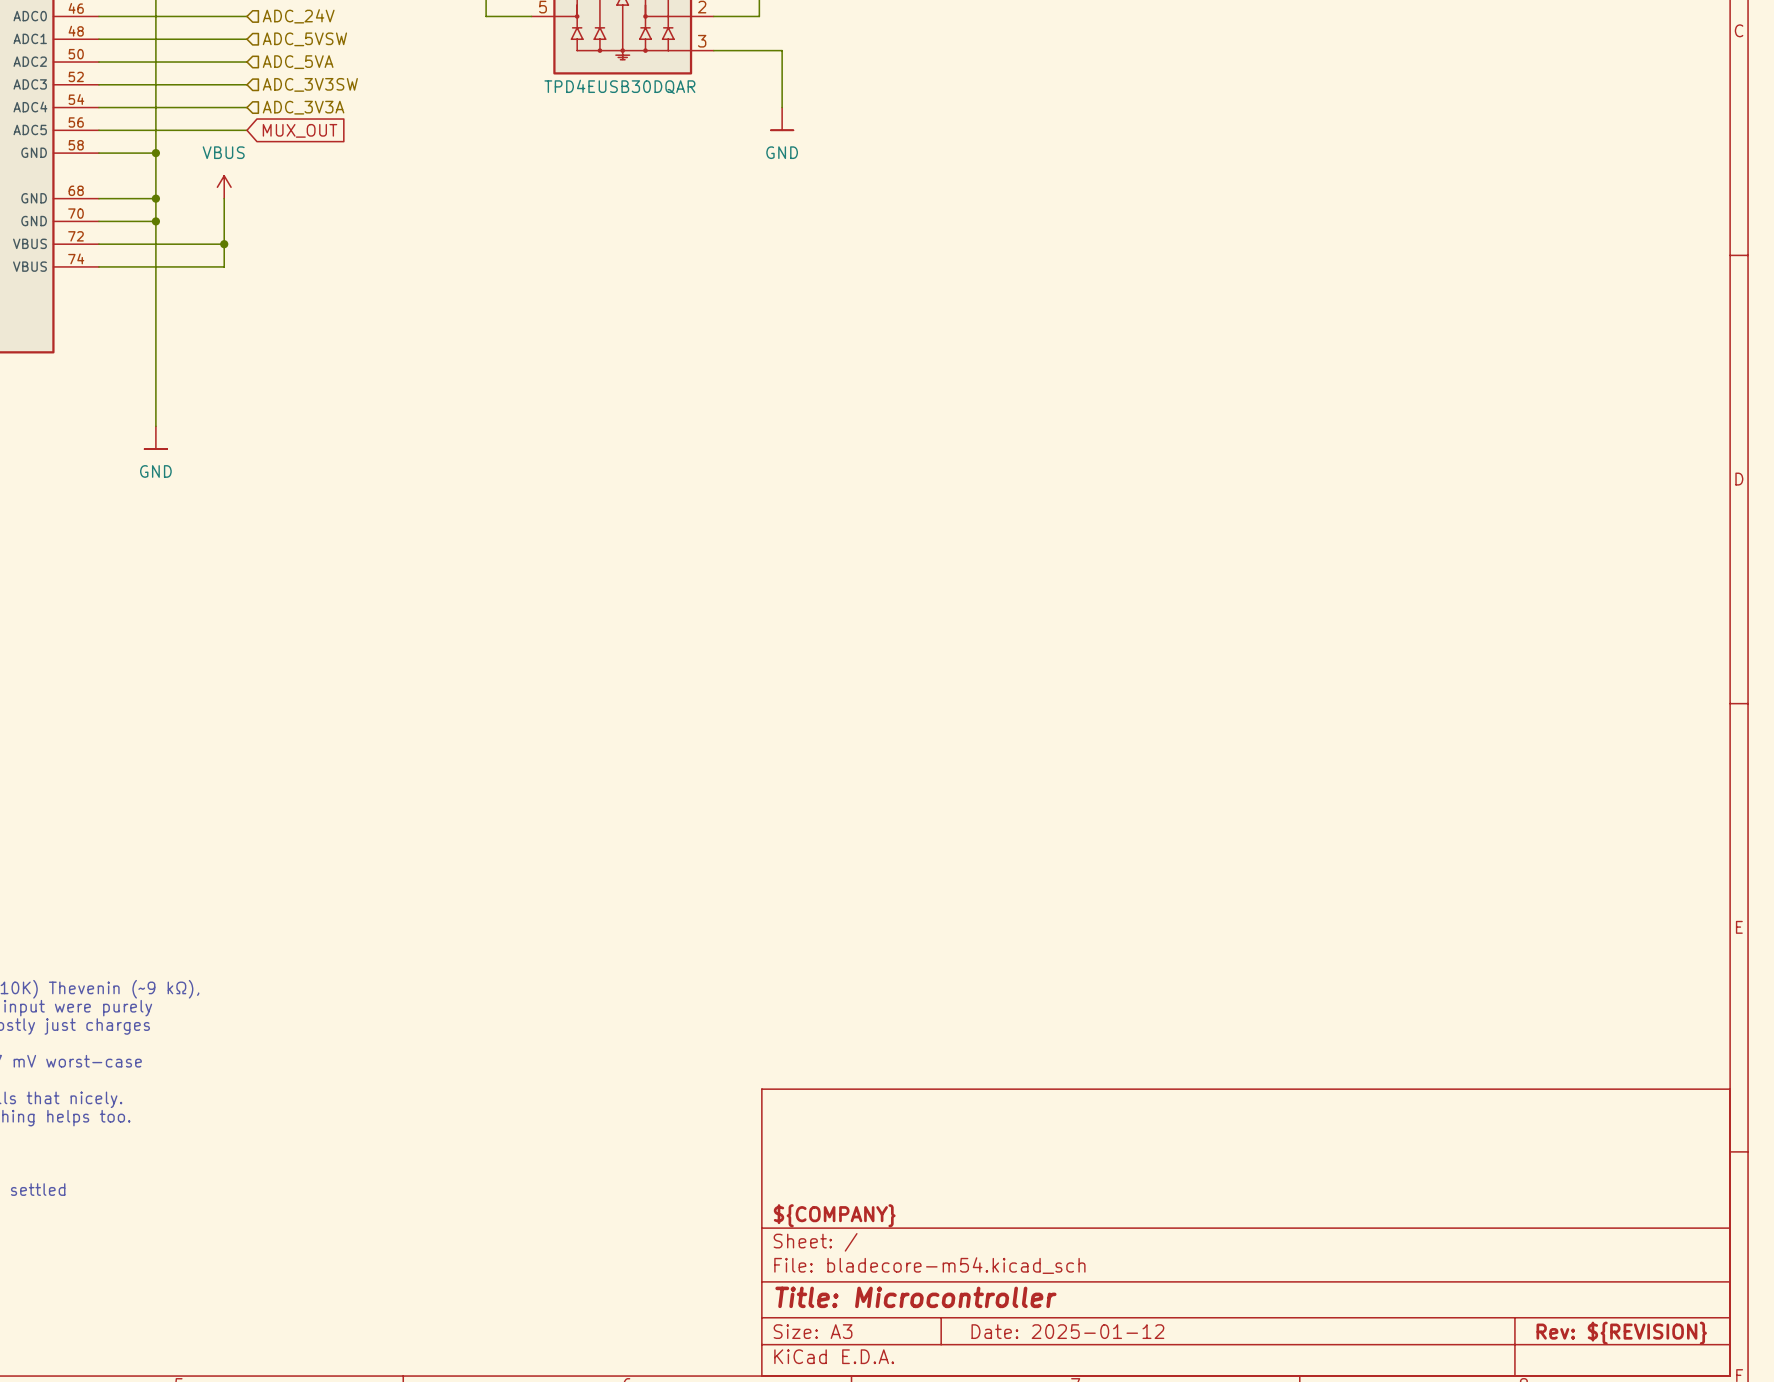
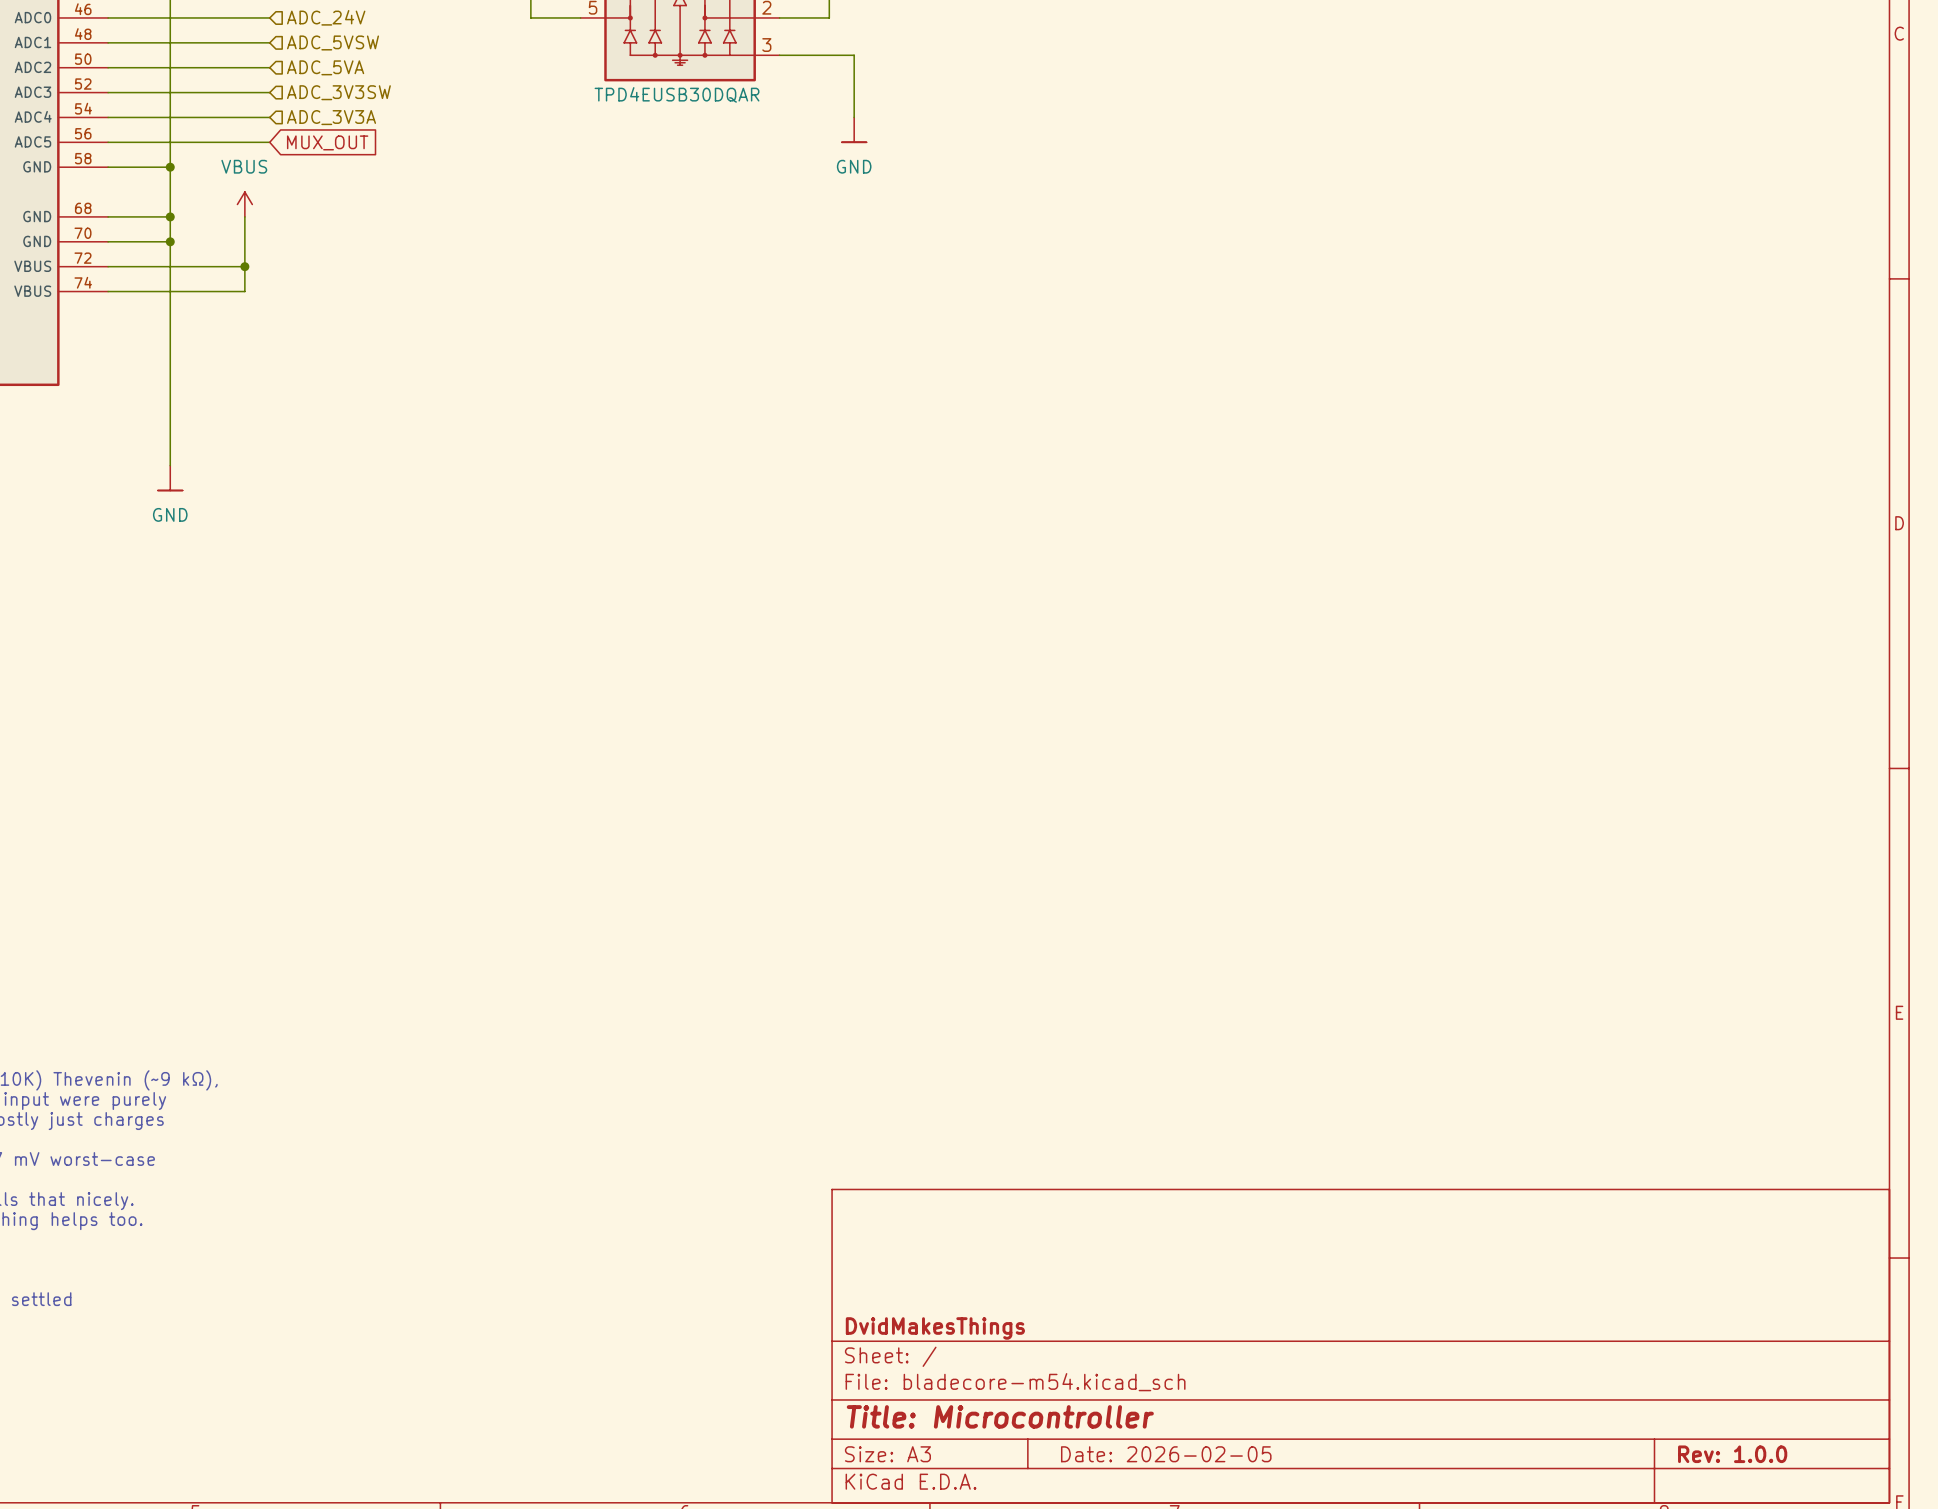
title block: ${COMPANY} (834, 1215) -> DvidMakesThings (935, 1328)
title block: Date: 2025-01-12 (1067, 1331) -> Date: 2026-02-05 (1166, 1454)
title block: Rev: ${REVISION} (1621, 1333) -> Rev: 1.0.0 (1732, 1454)

